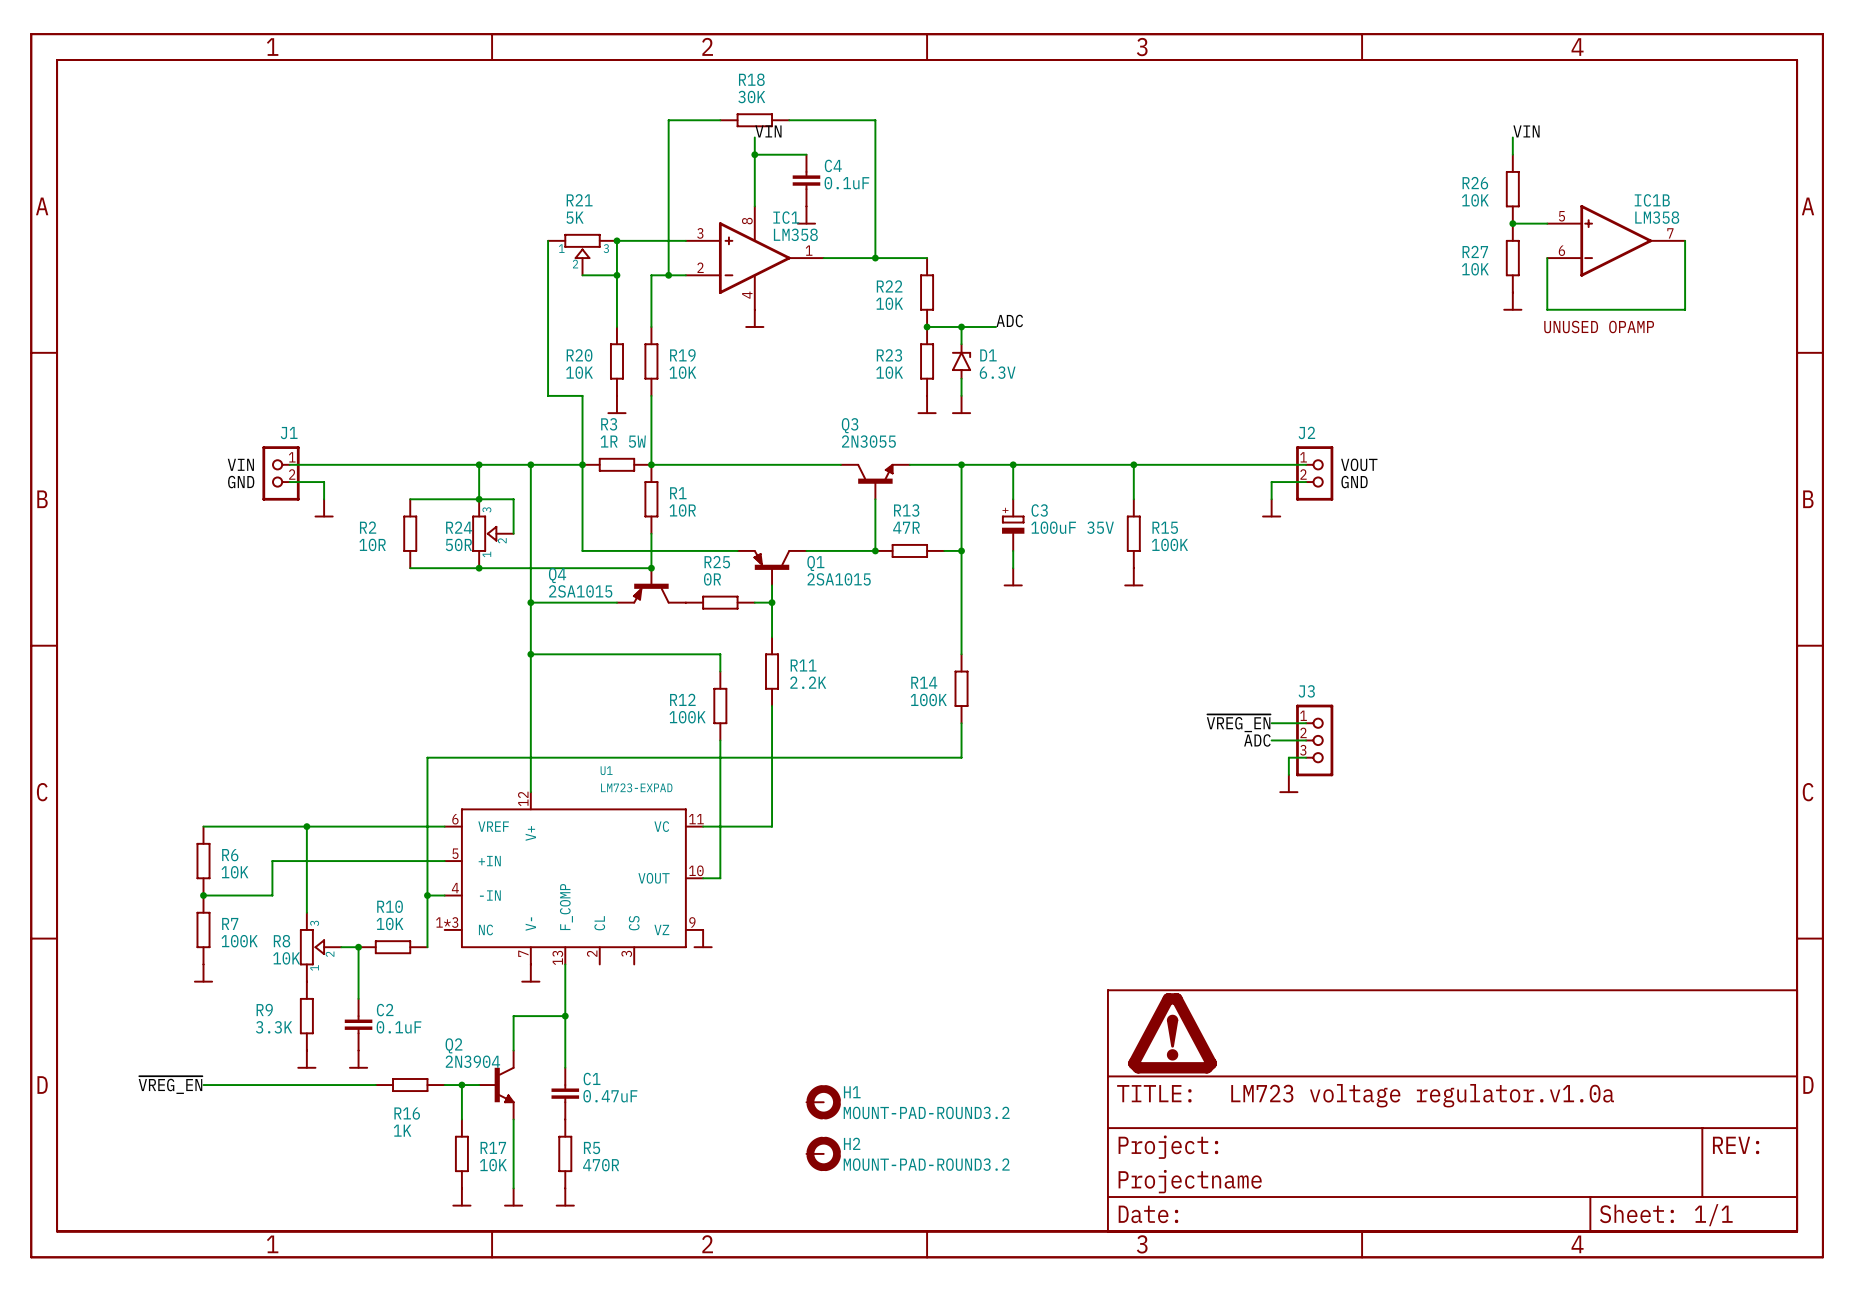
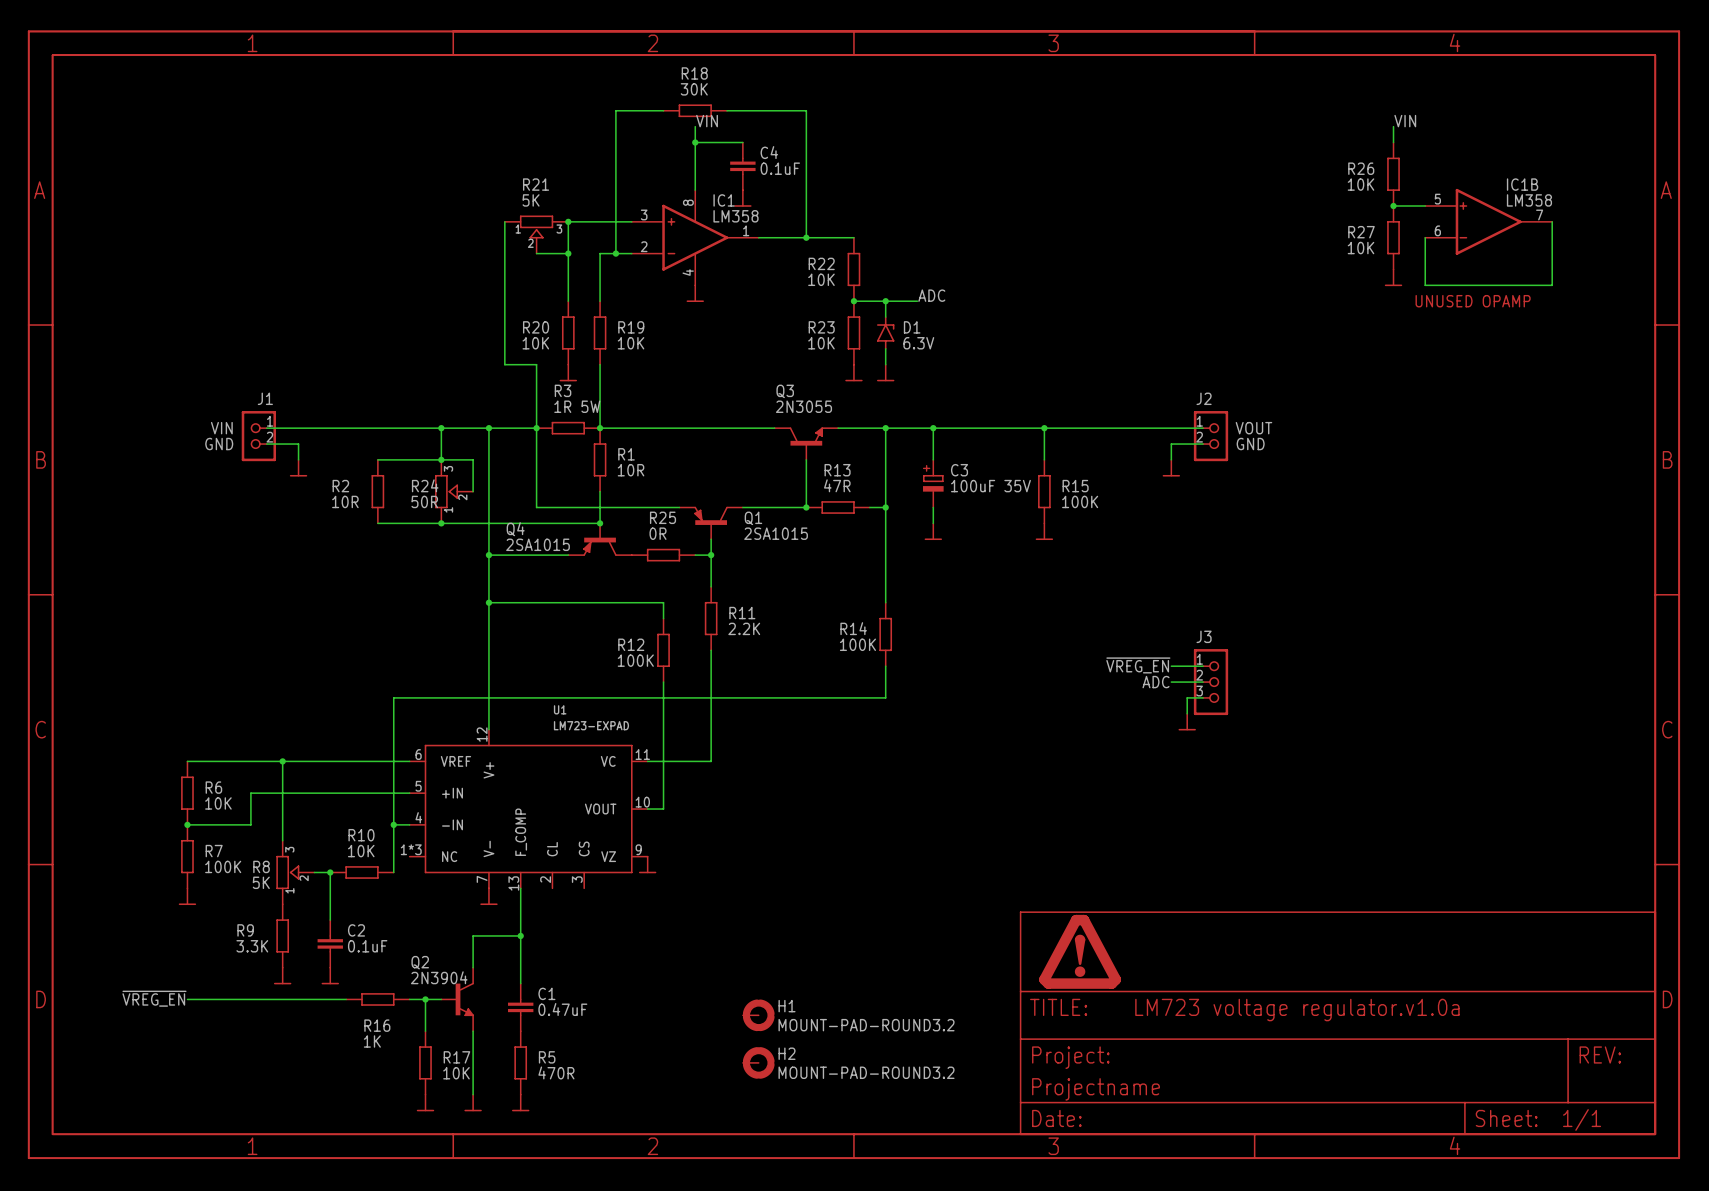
R8 value: 10K (286, 958) -> 5K (261, 882)

